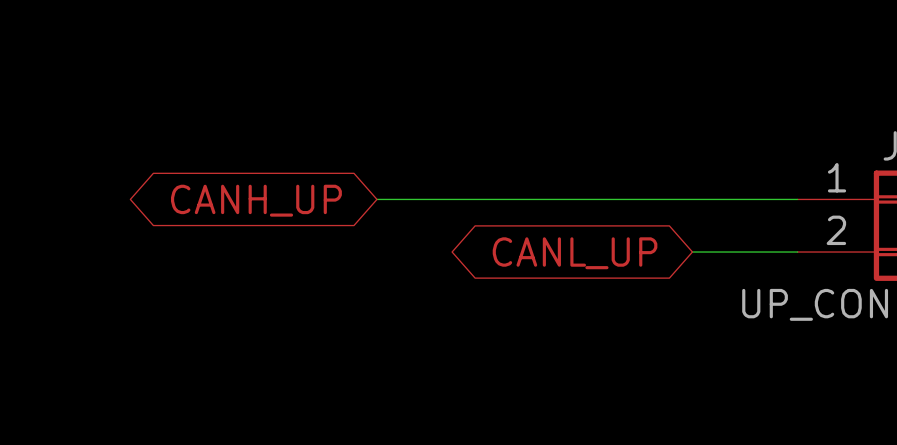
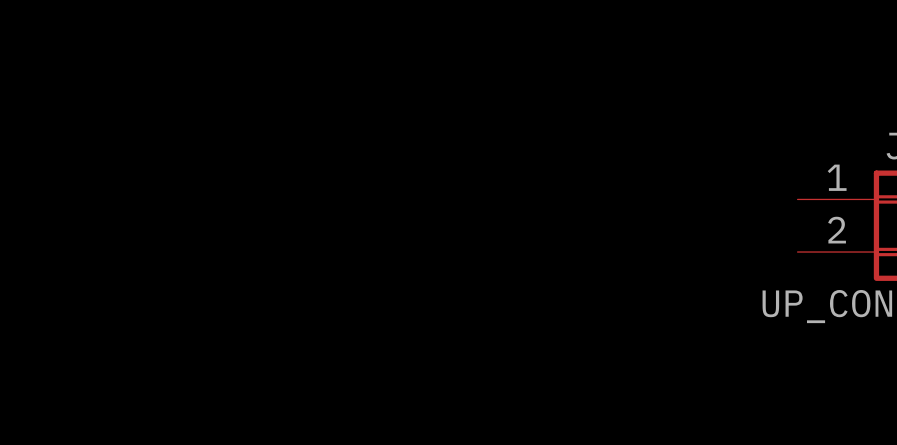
wire: (376, 199) (797, 199) -> none
global label: CANH_UP (256, 200) -> none
wire: (692, 252) (797, 252) -> none
global label: CANL_UP (575, 253) -> none

